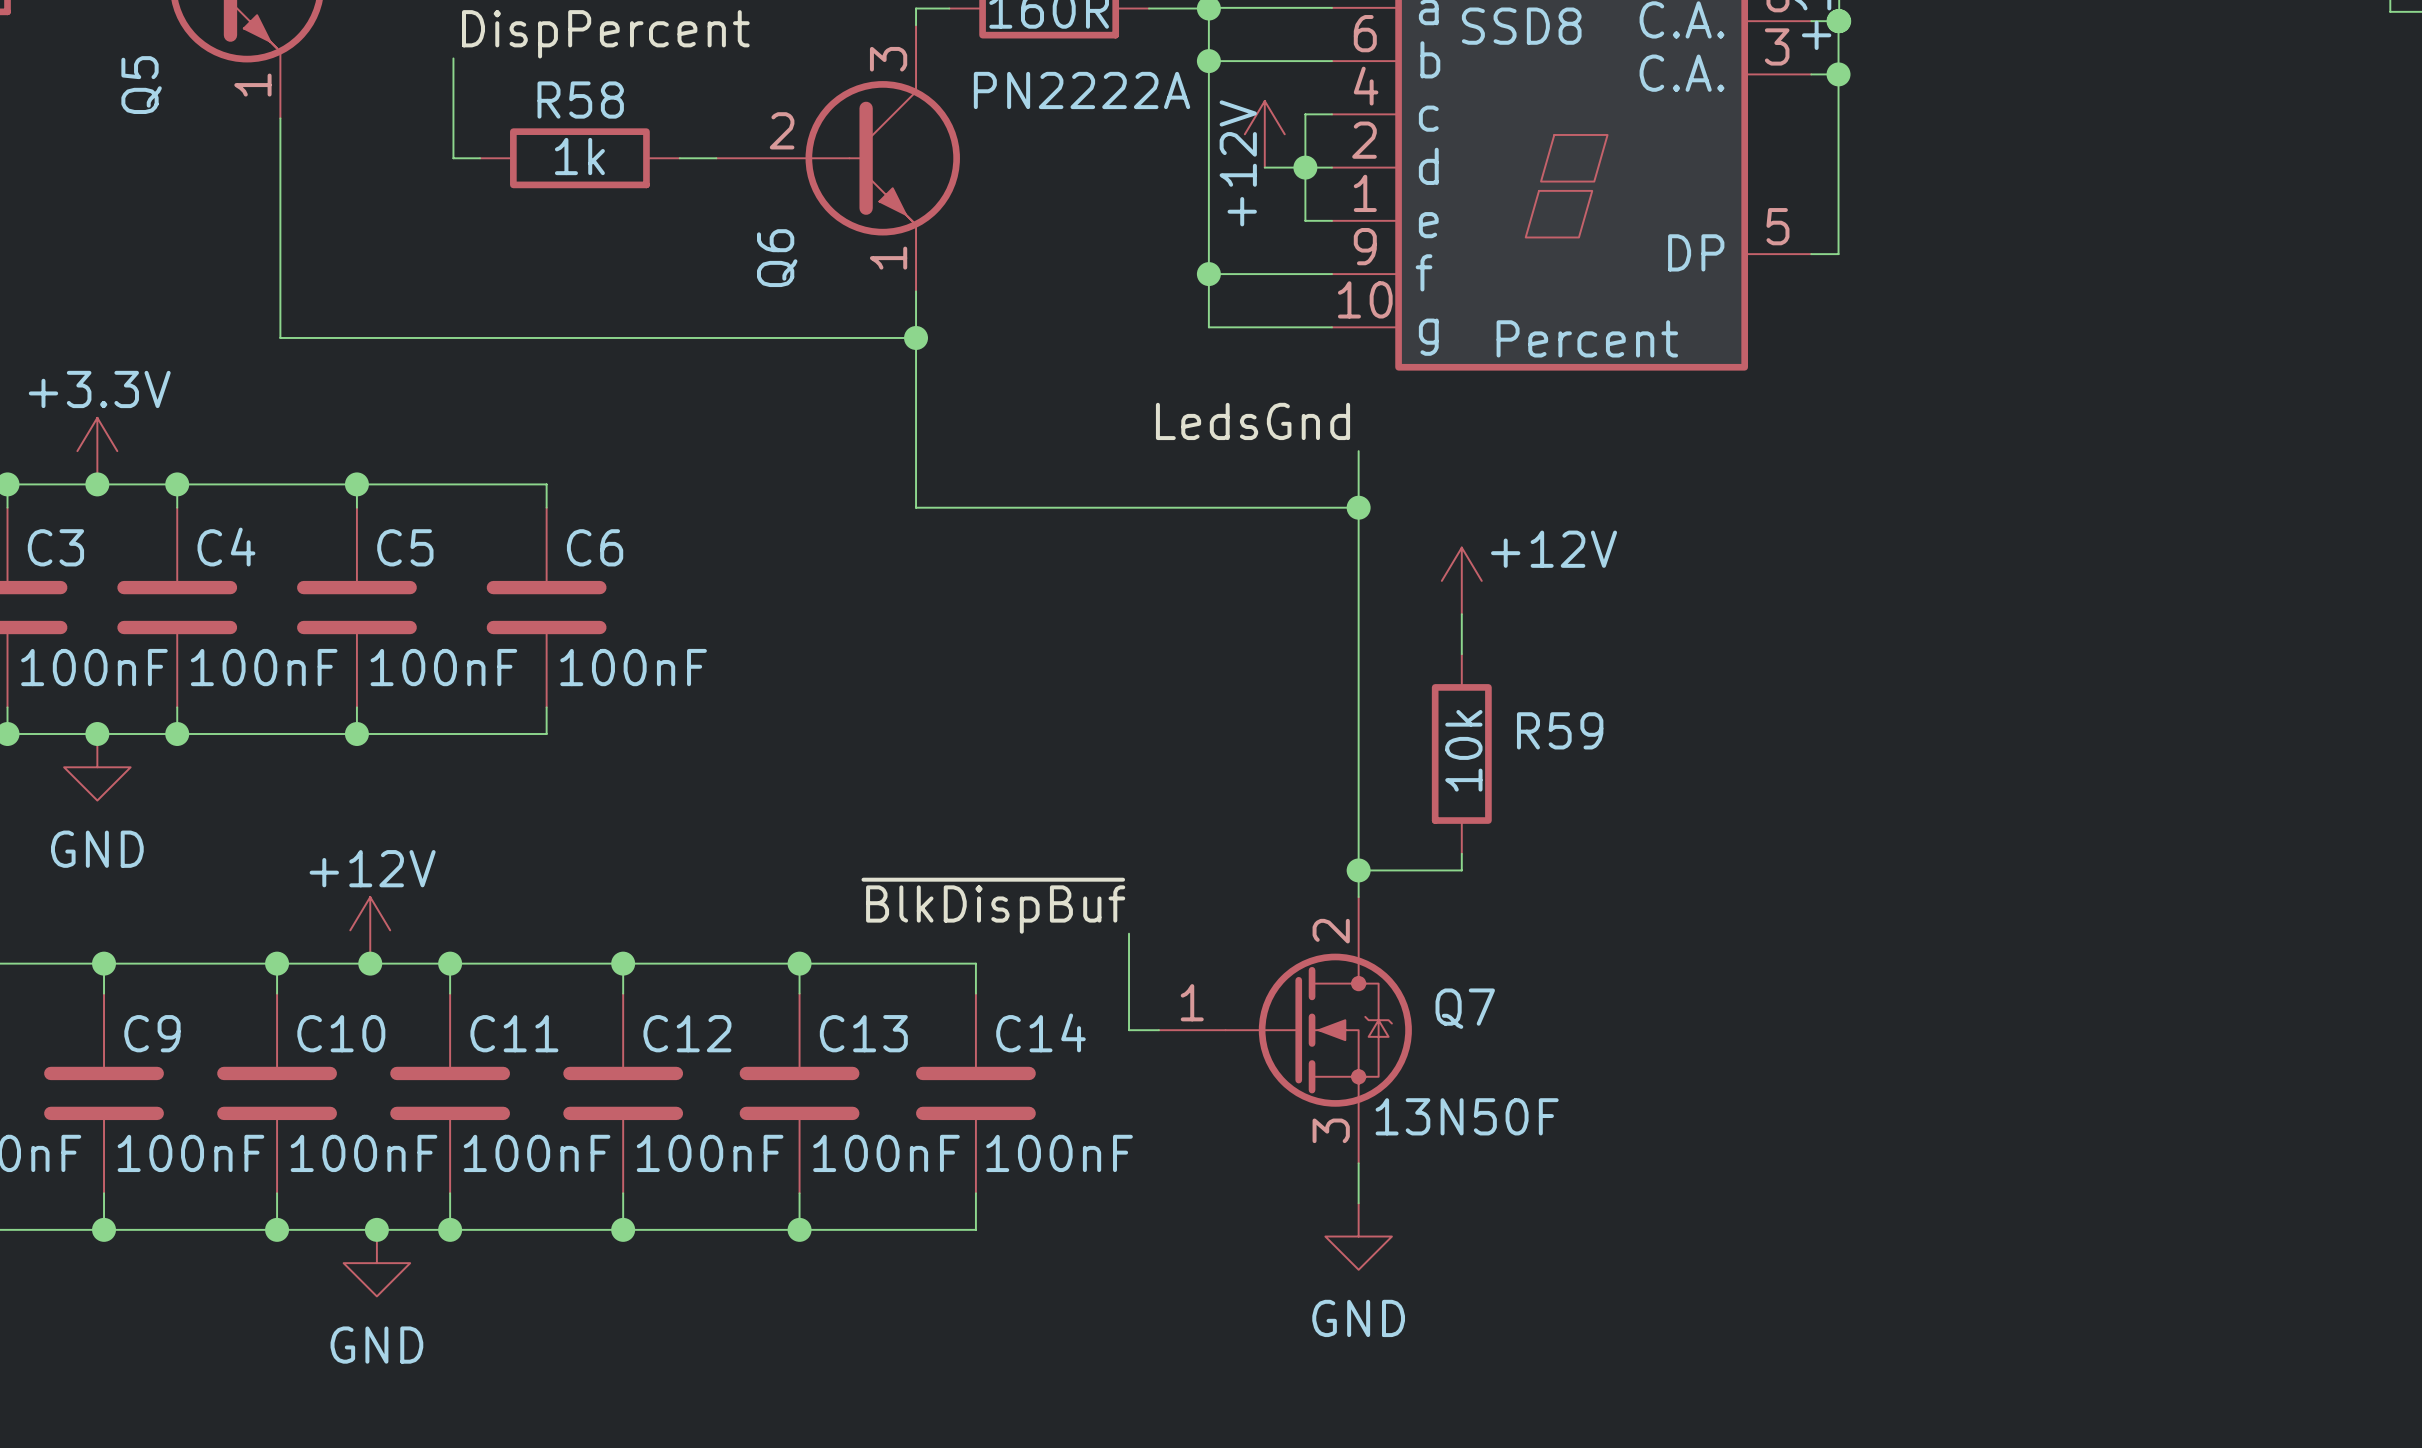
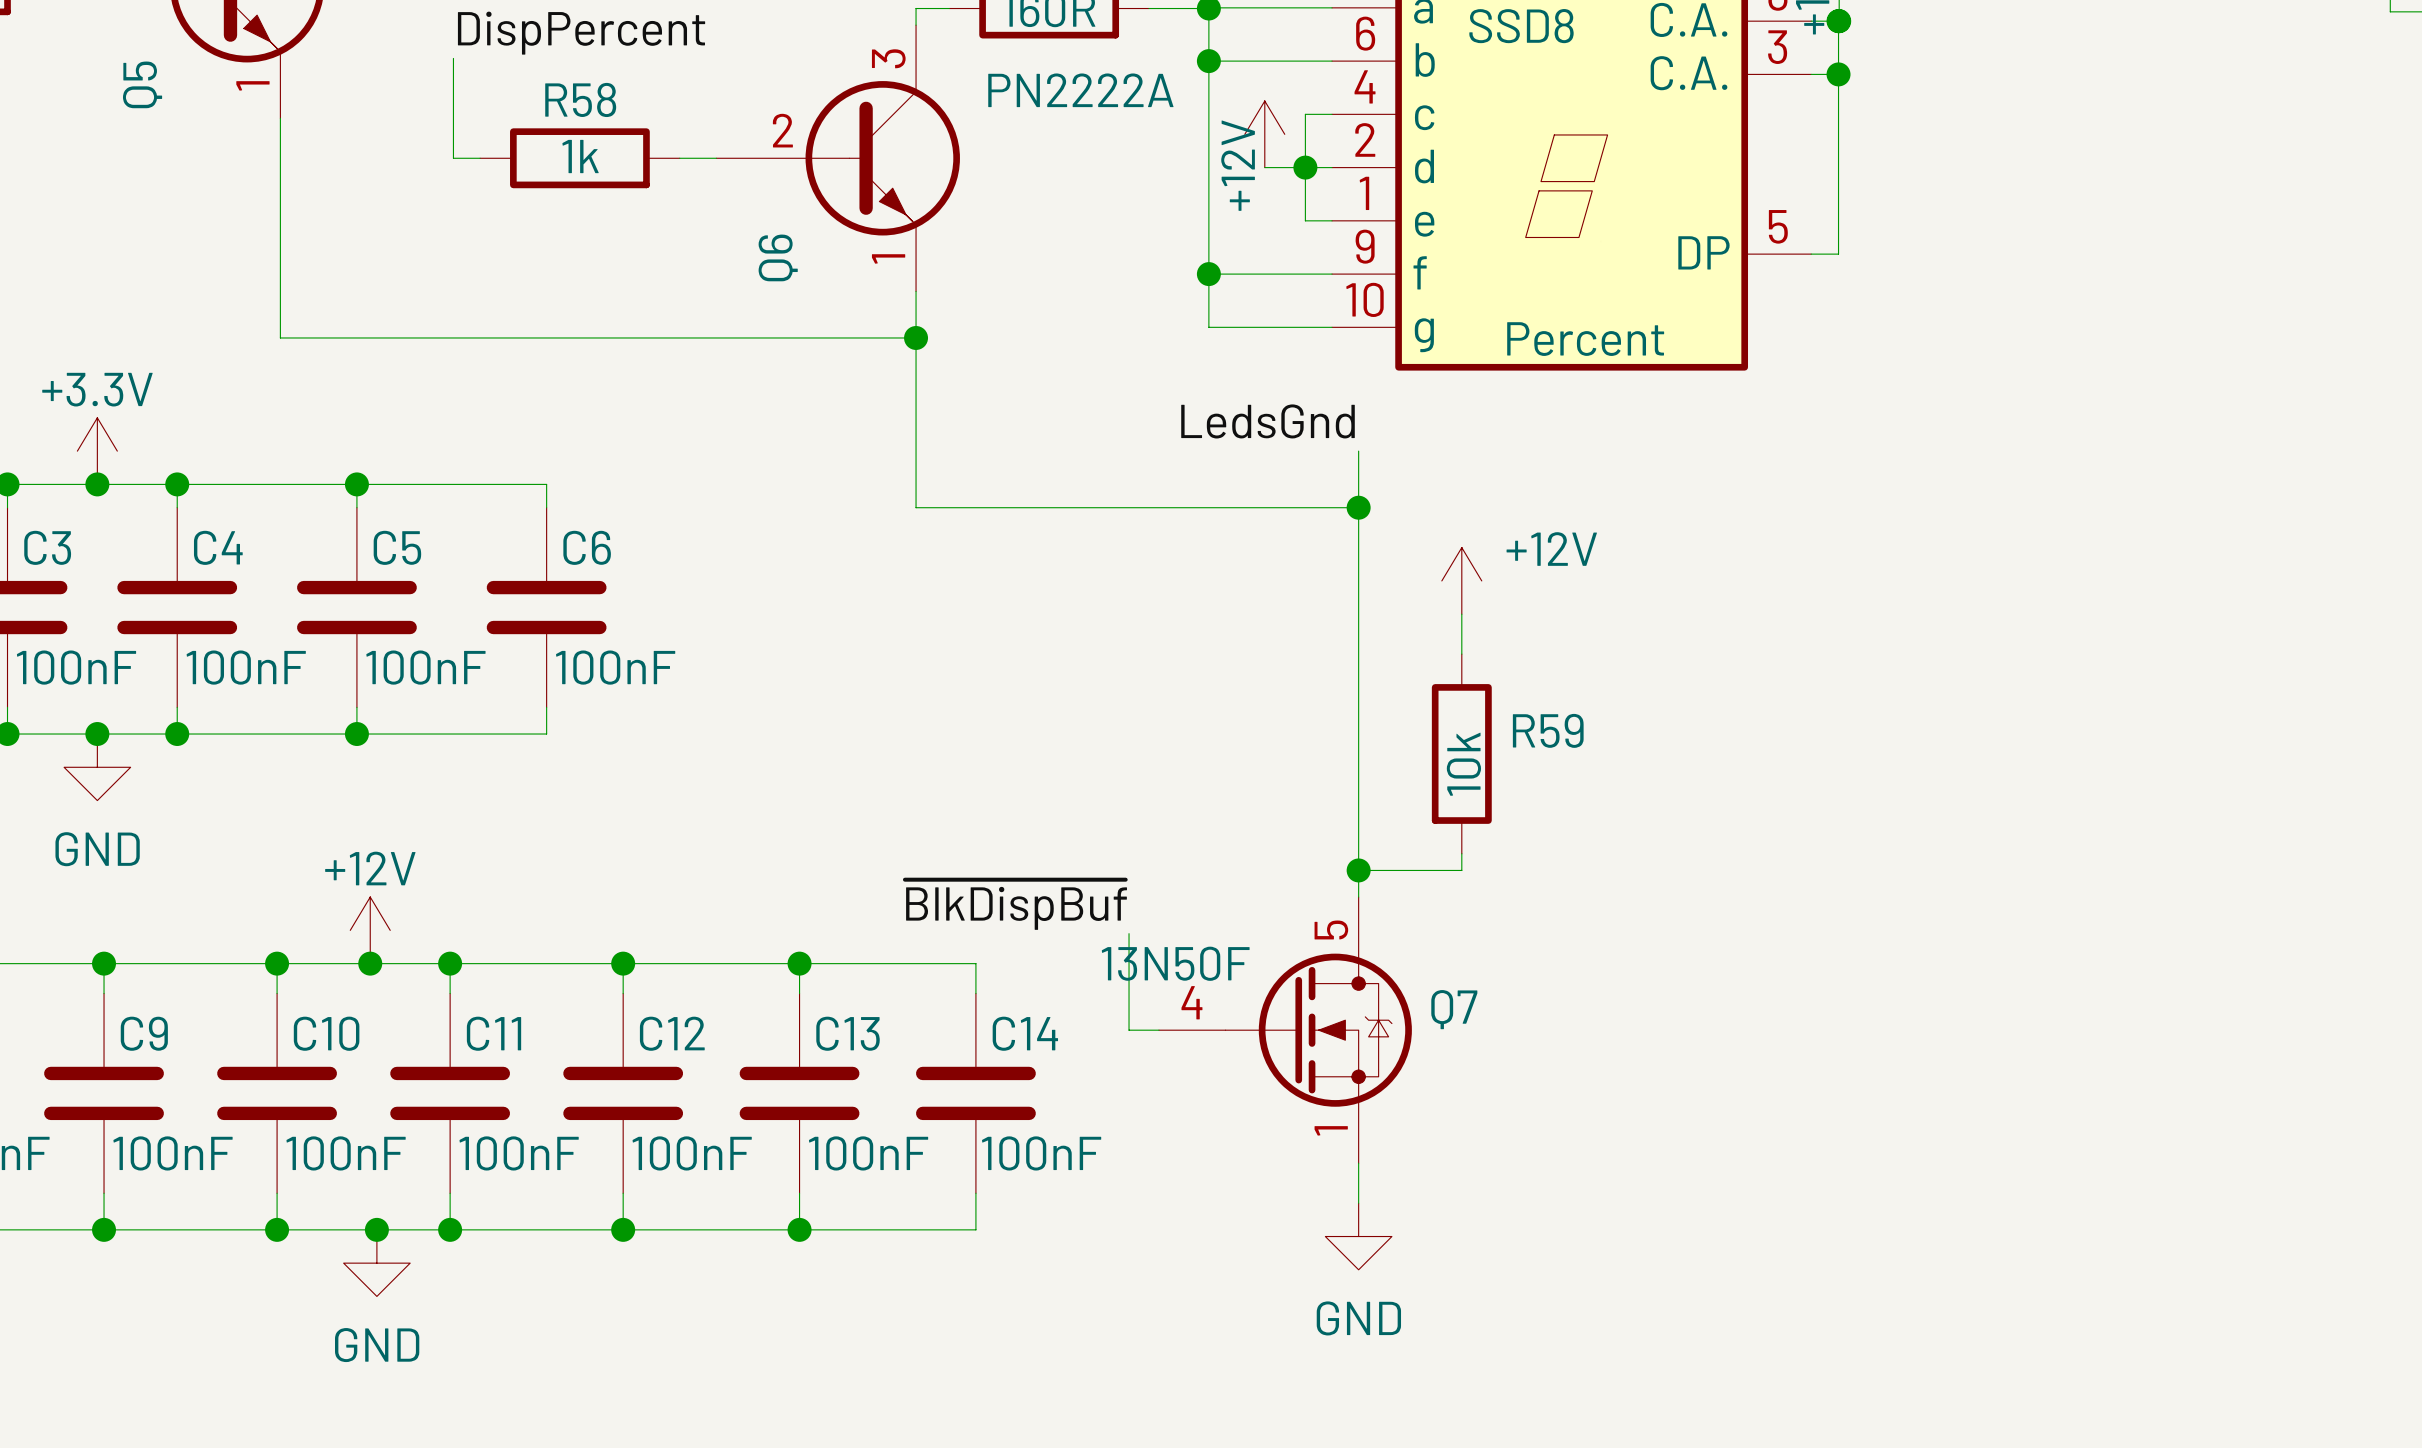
Q7 pin number: 2 (1331, 931) -> 5 (1331, 929)
Q7 pin number: 1 (1192, 1002) -> 4 (1191, 1002)
Q7 value position: 13N50F (1467, 1116) -> 13N50F (1175, 963)
Q7 pin number: 3 (1331, 1130) -> 1 (1331, 1130)

